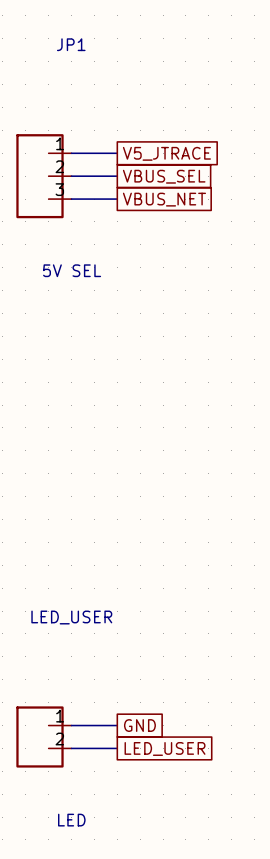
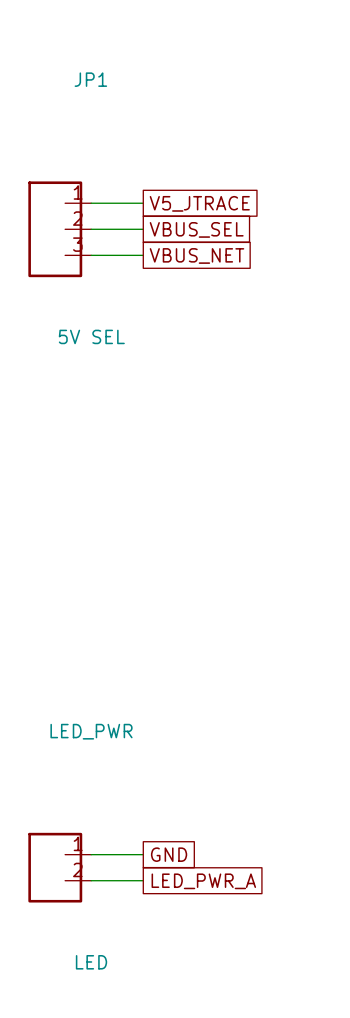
LED_USER name: LED_USER (71, 617) -> LED_PWR (91, 731)
global label: LED_USER (165, 748) -> LED_PWR_A (203, 881)

